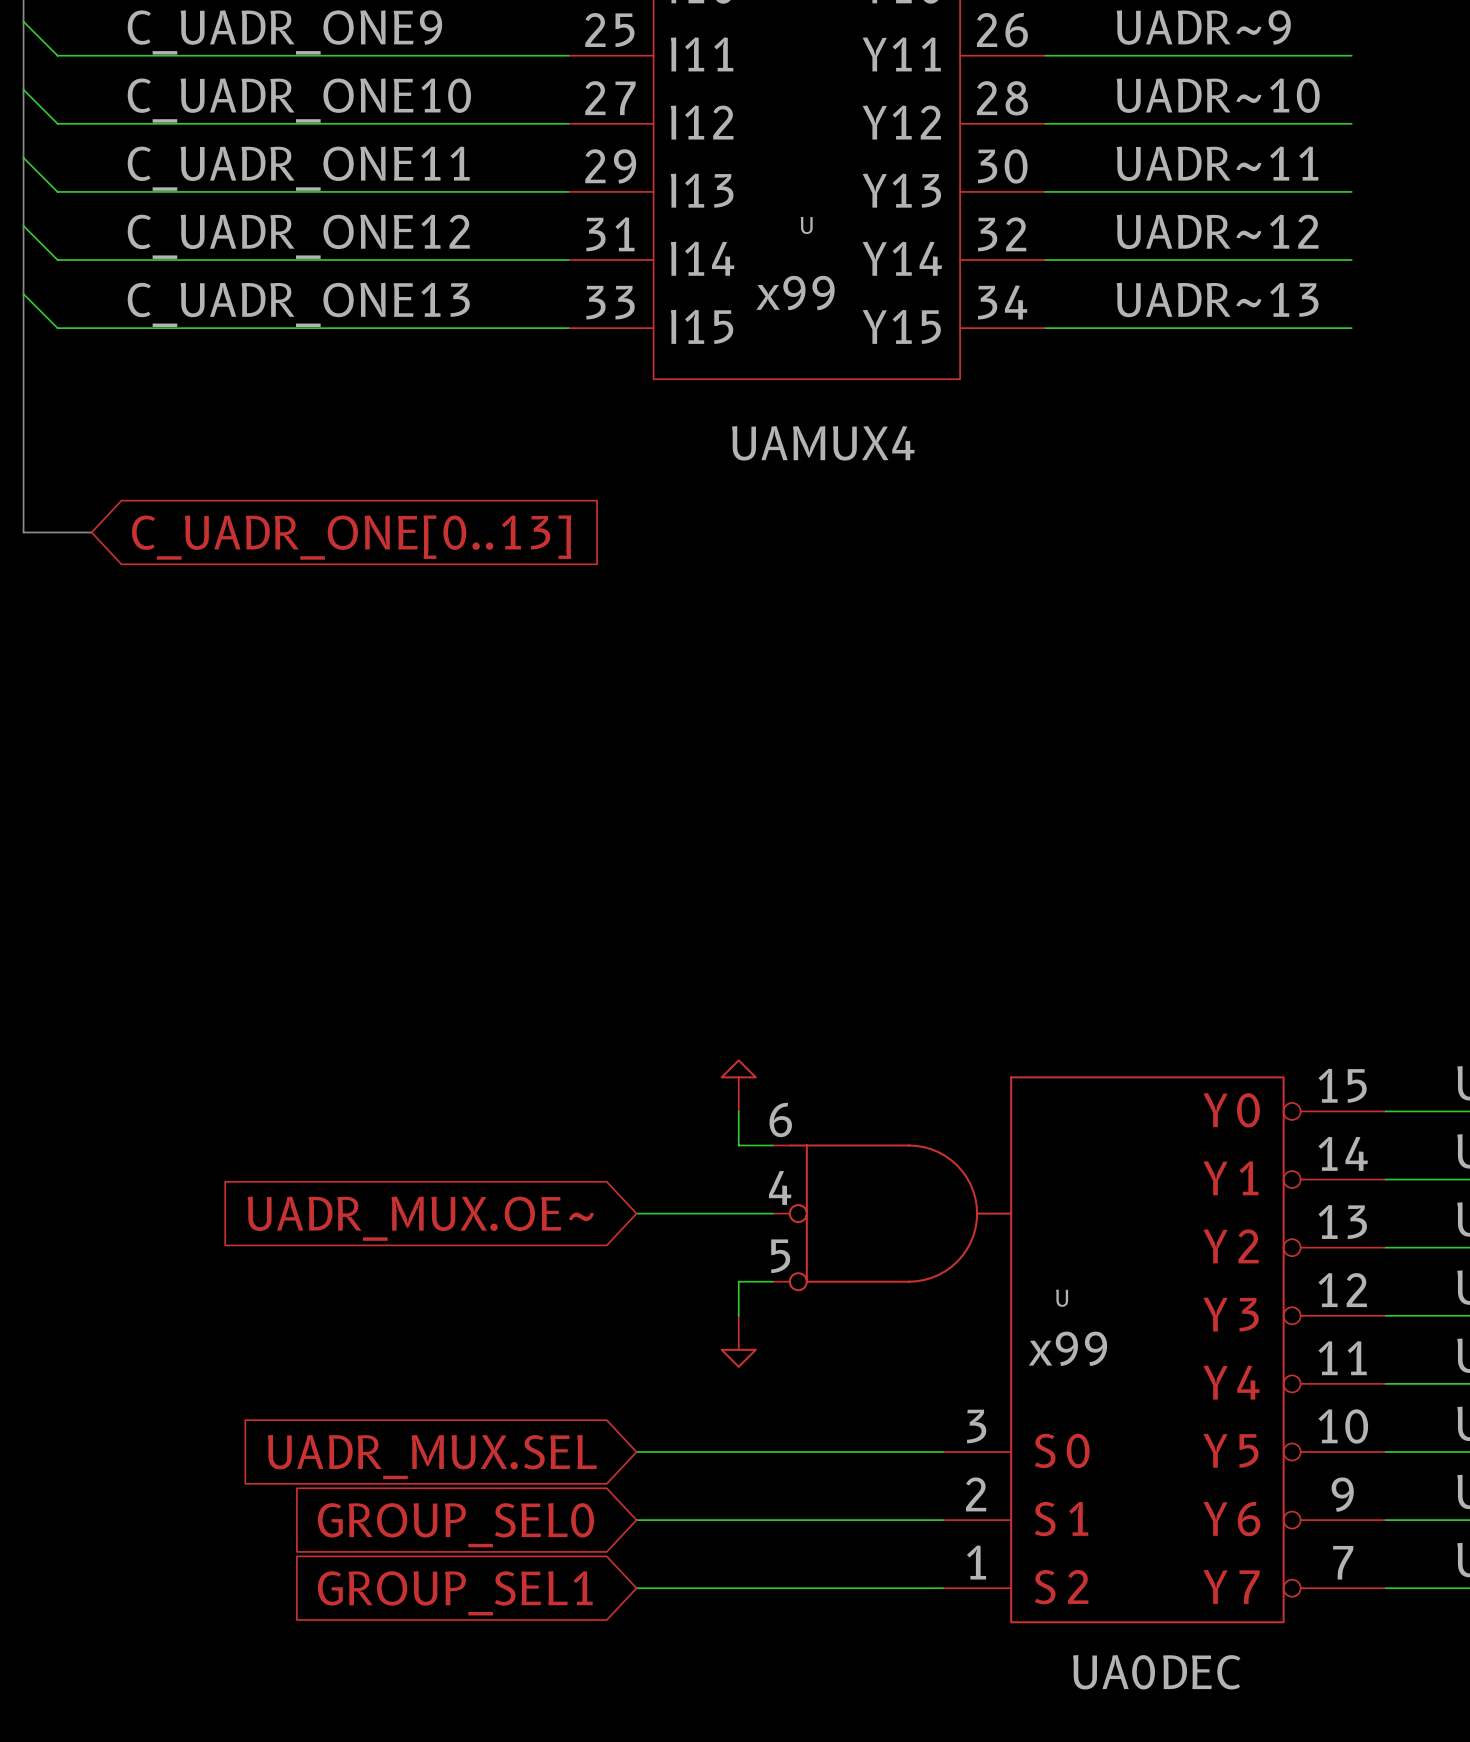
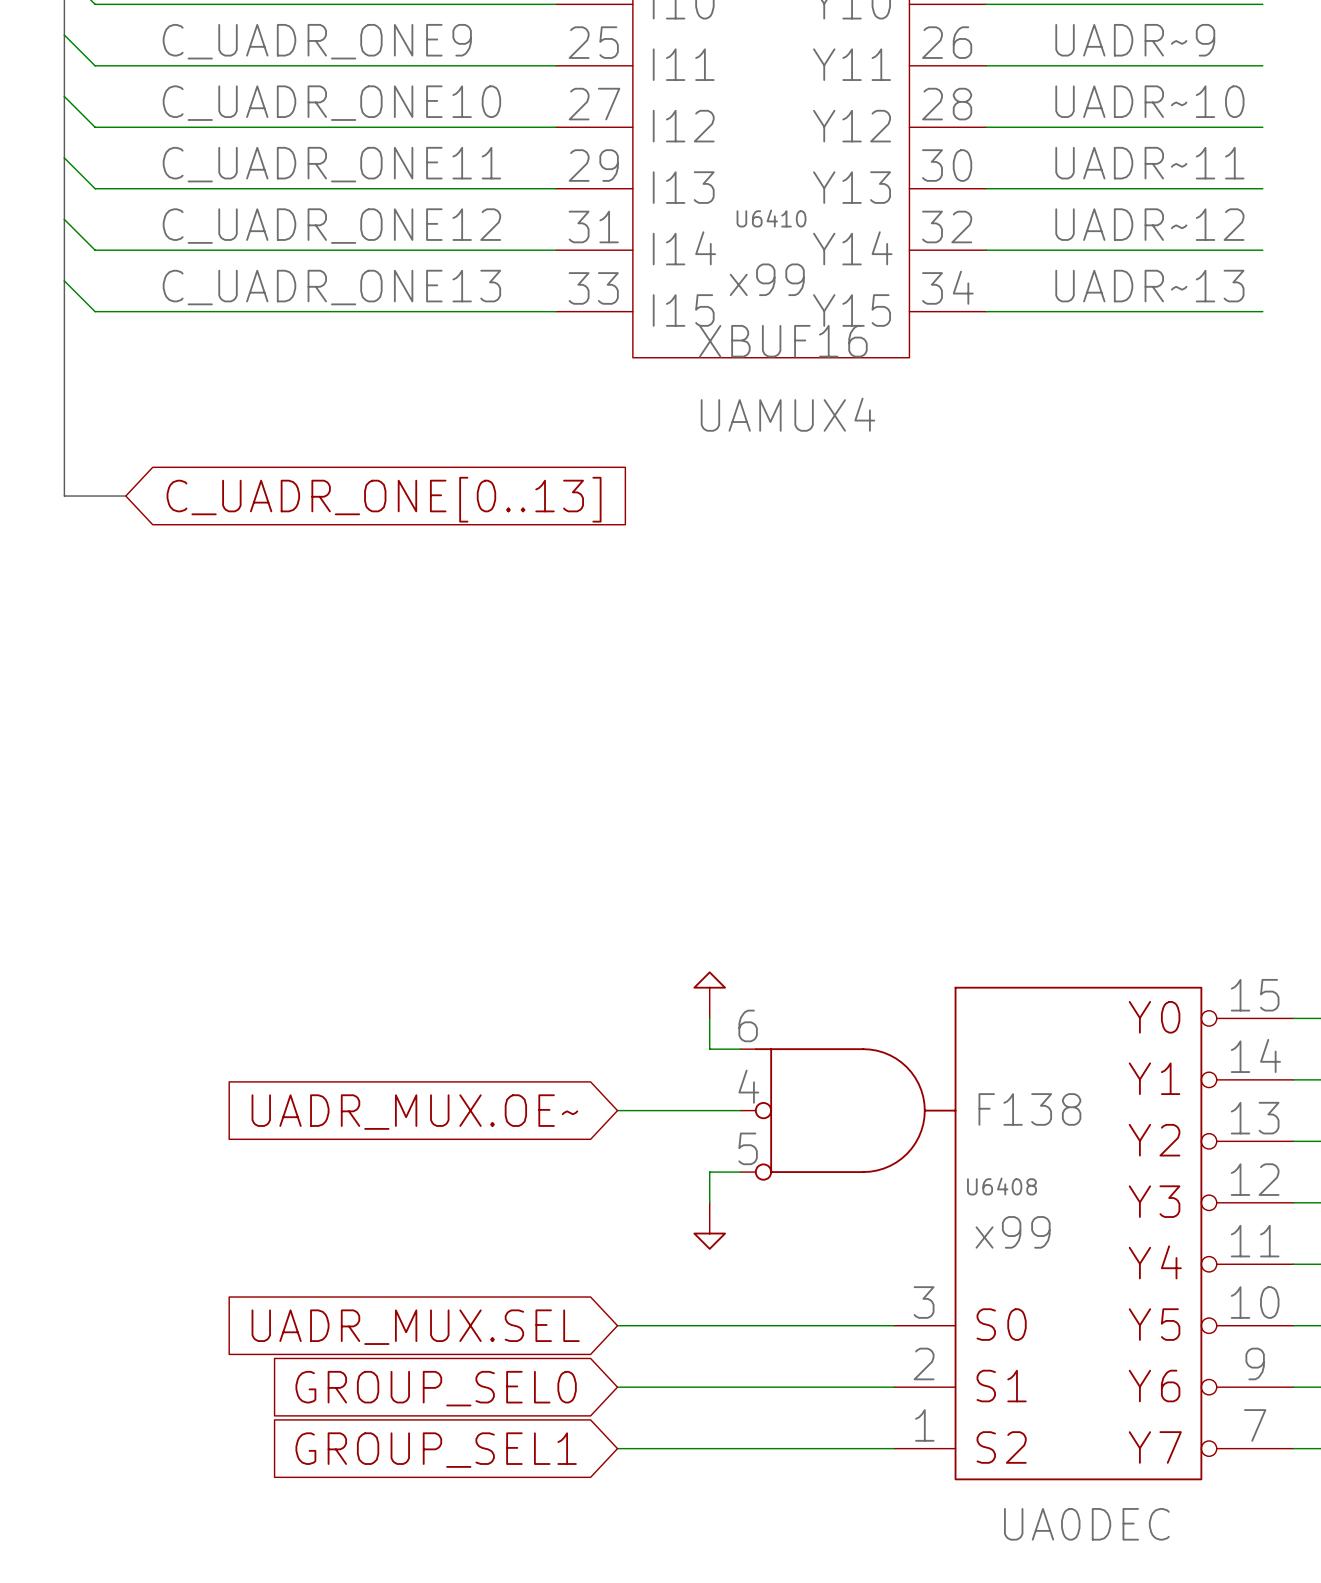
U name: U (806, 225) -> U6410 (771, 218)
U value: none -> XBUF16 (783, 341)
U value: none -> F138 (1029, 1109)
U name: U (1062, 1298) -> U6408 (1001, 1186)

